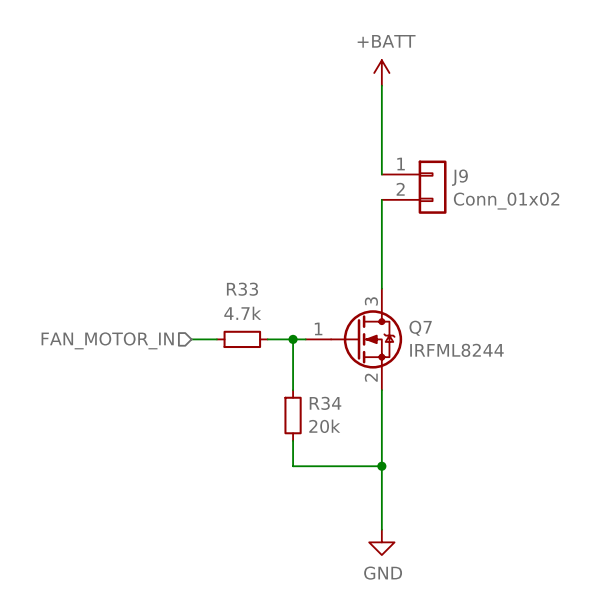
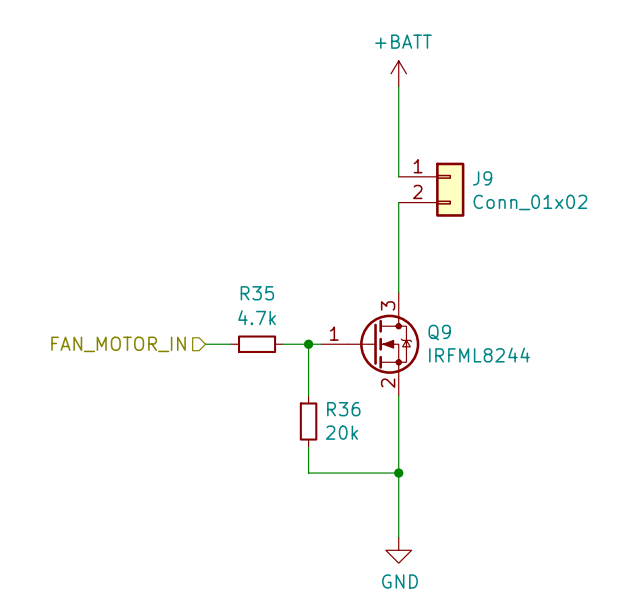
R33 name: R33 (242, 289) -> R35 (257, 293)
Q7 name: Q7 (420, 328) -> Q9 (439, 332)
R34 name: R34 (325, 403) -> R36 (343, 409)

